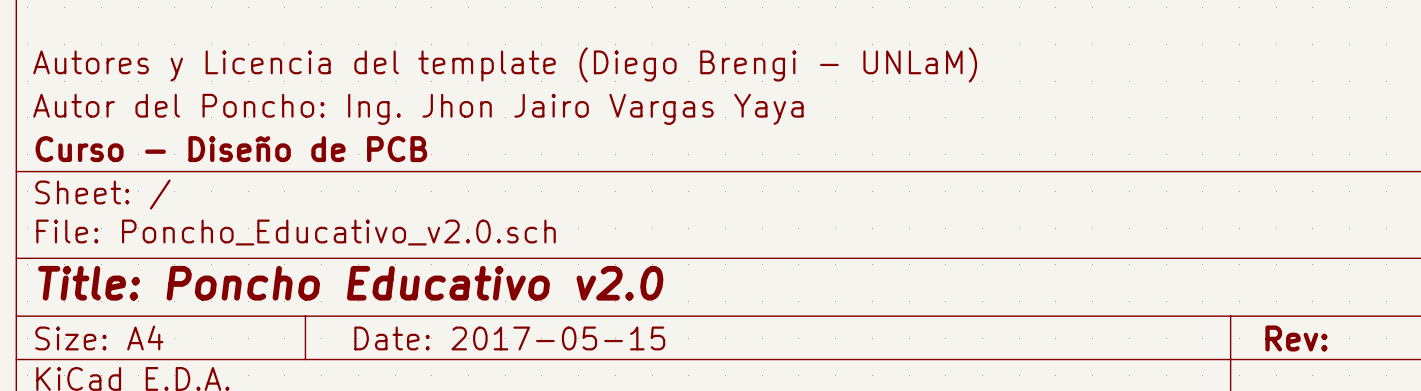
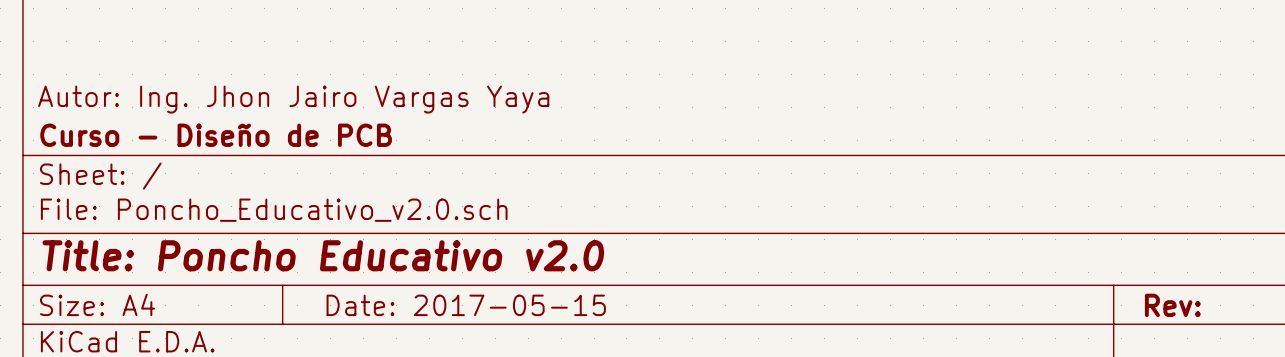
title block: Autores y Licencia del template (Diego Brengi - UNLaM) (505, 64) -> none
title block: Autor del Poncho: Ing. Jhon Jairo Vargas Yaya (418, 109) -> Autor: Ing. Jhon Jairo Vargas Yaya (293, 99)

